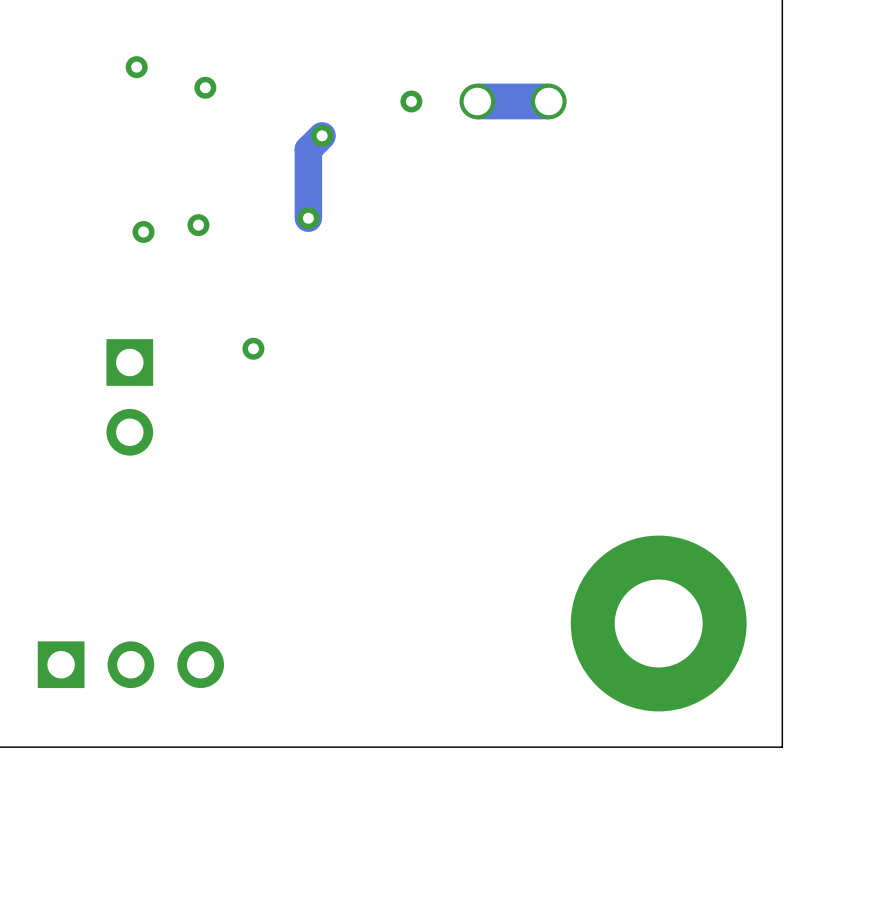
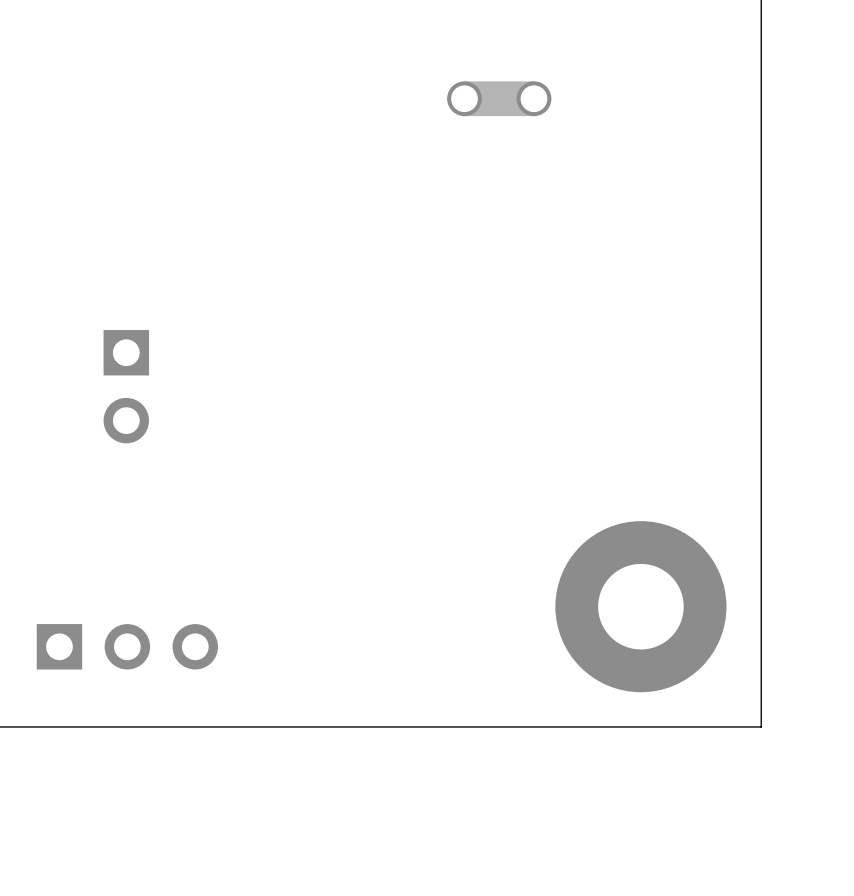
via: (136, 67) -> none
via: (205, 87) -> none
via: (411, 101) -> none
track: (322, 135) (308, 149) (308, 218) -> none
via: (322, 135) -> none
via: (308, 218) -> none
via: (198, 225) -> none
via: (143, 231) -> none
via: (253, 348) -> none

